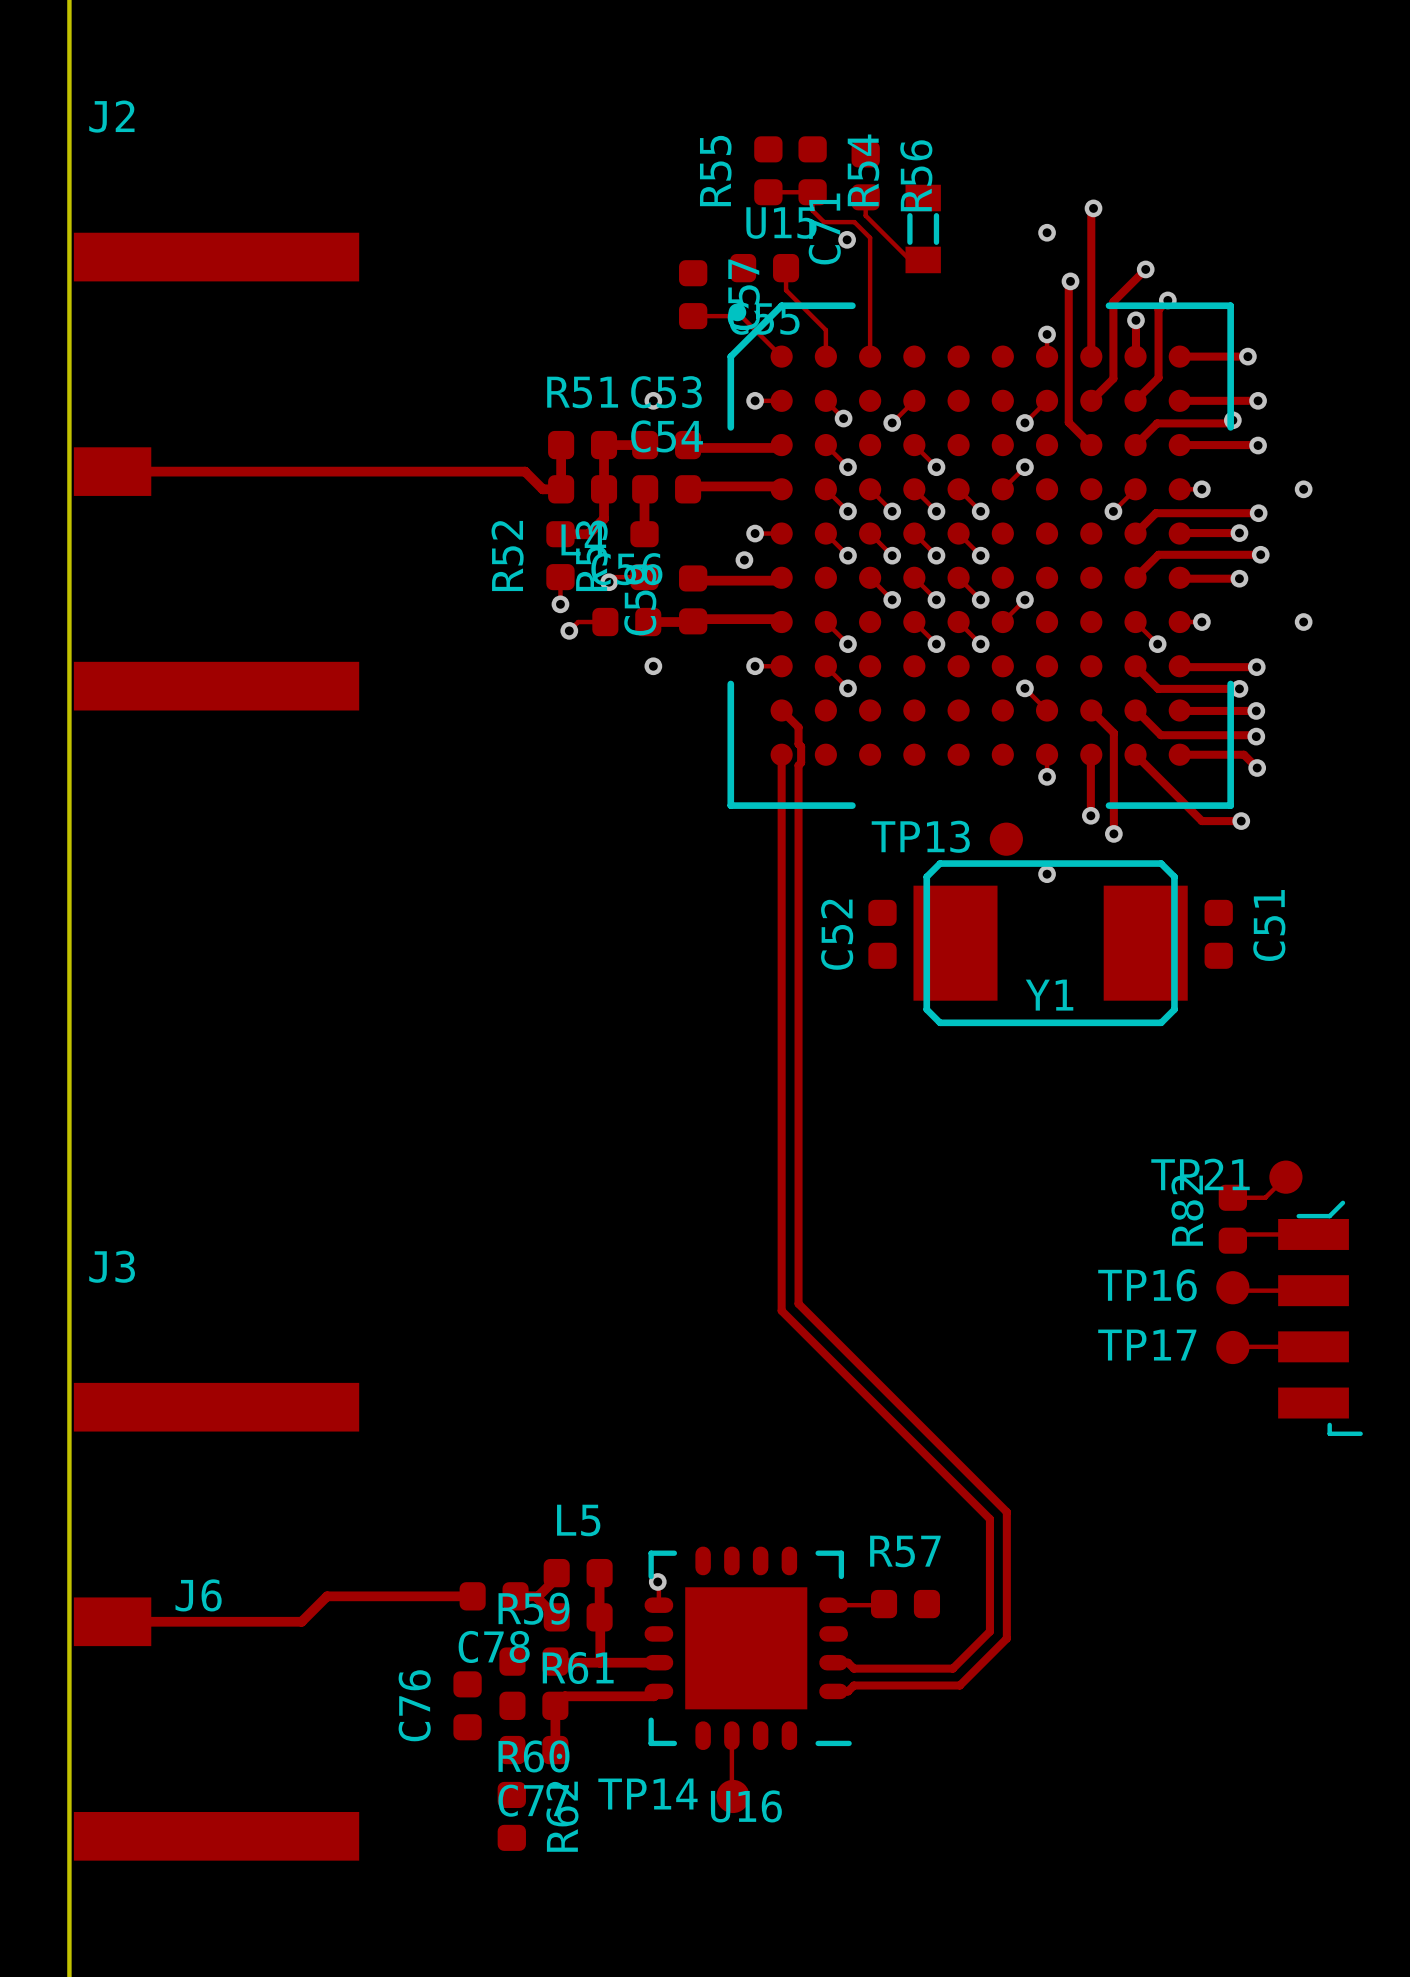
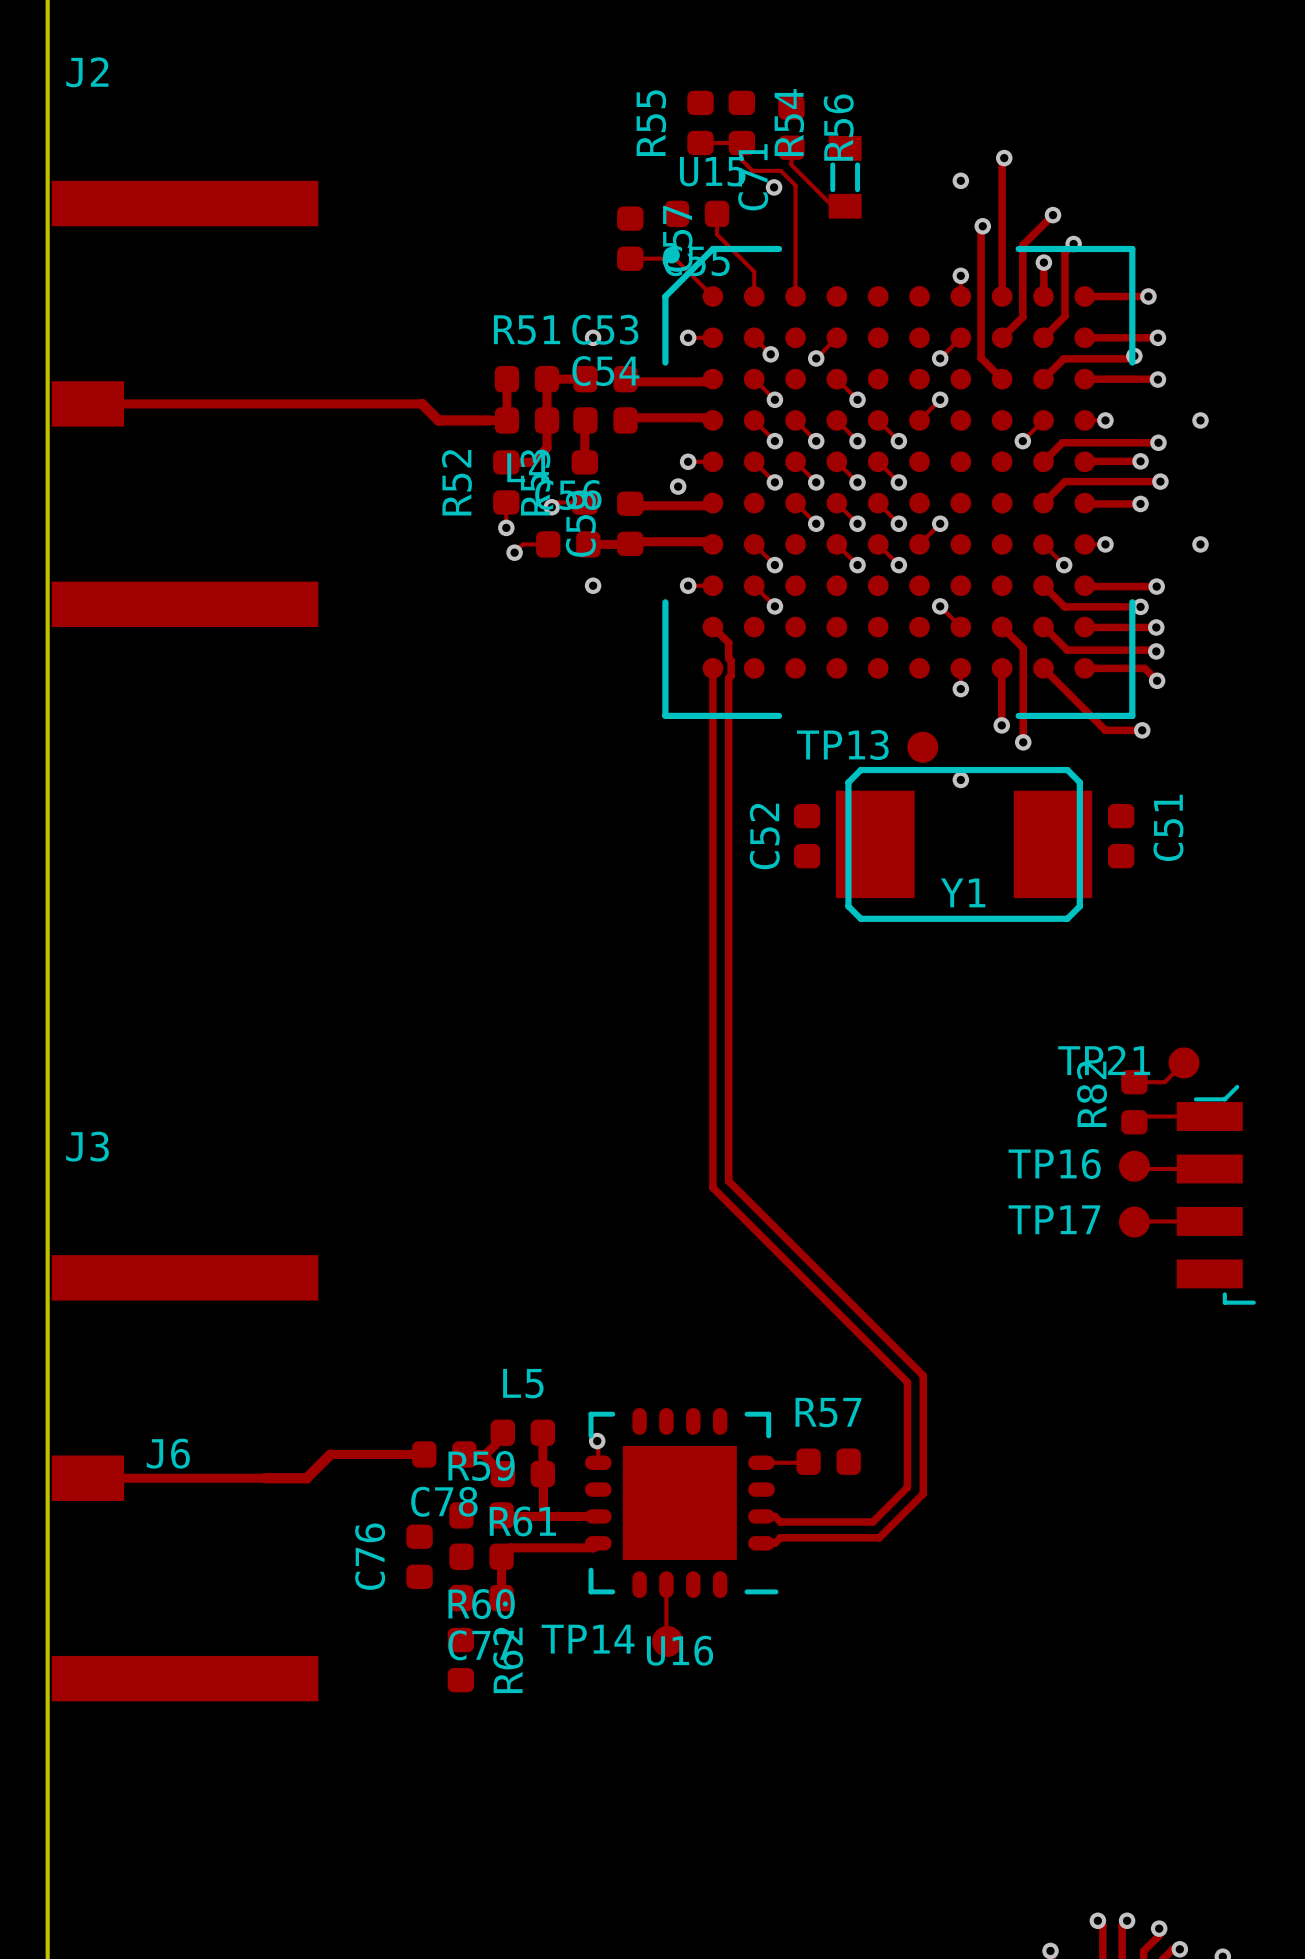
track: (470, 471) (525, 471) (542, 489) -> (422, 403) (438, 420) (489, 420)
track: (372, 1596) (327, 1596) (301, 1621) -> (330, 1454) (306, 1478) (264, 1478)

